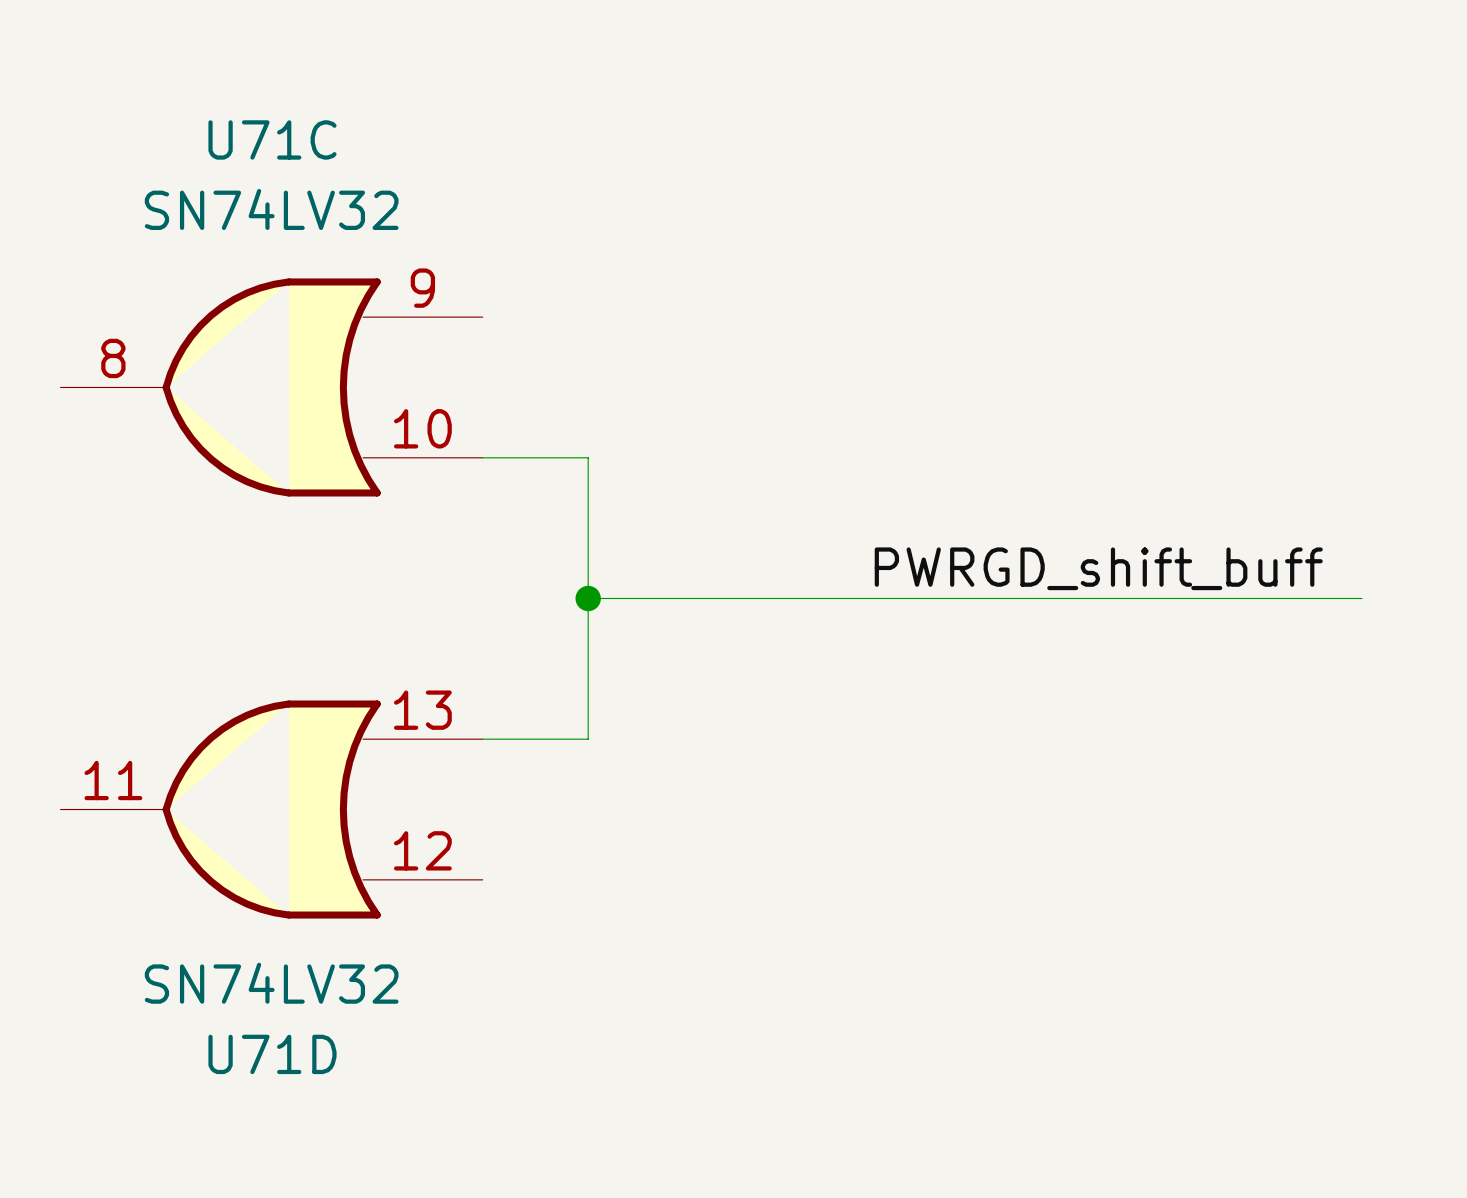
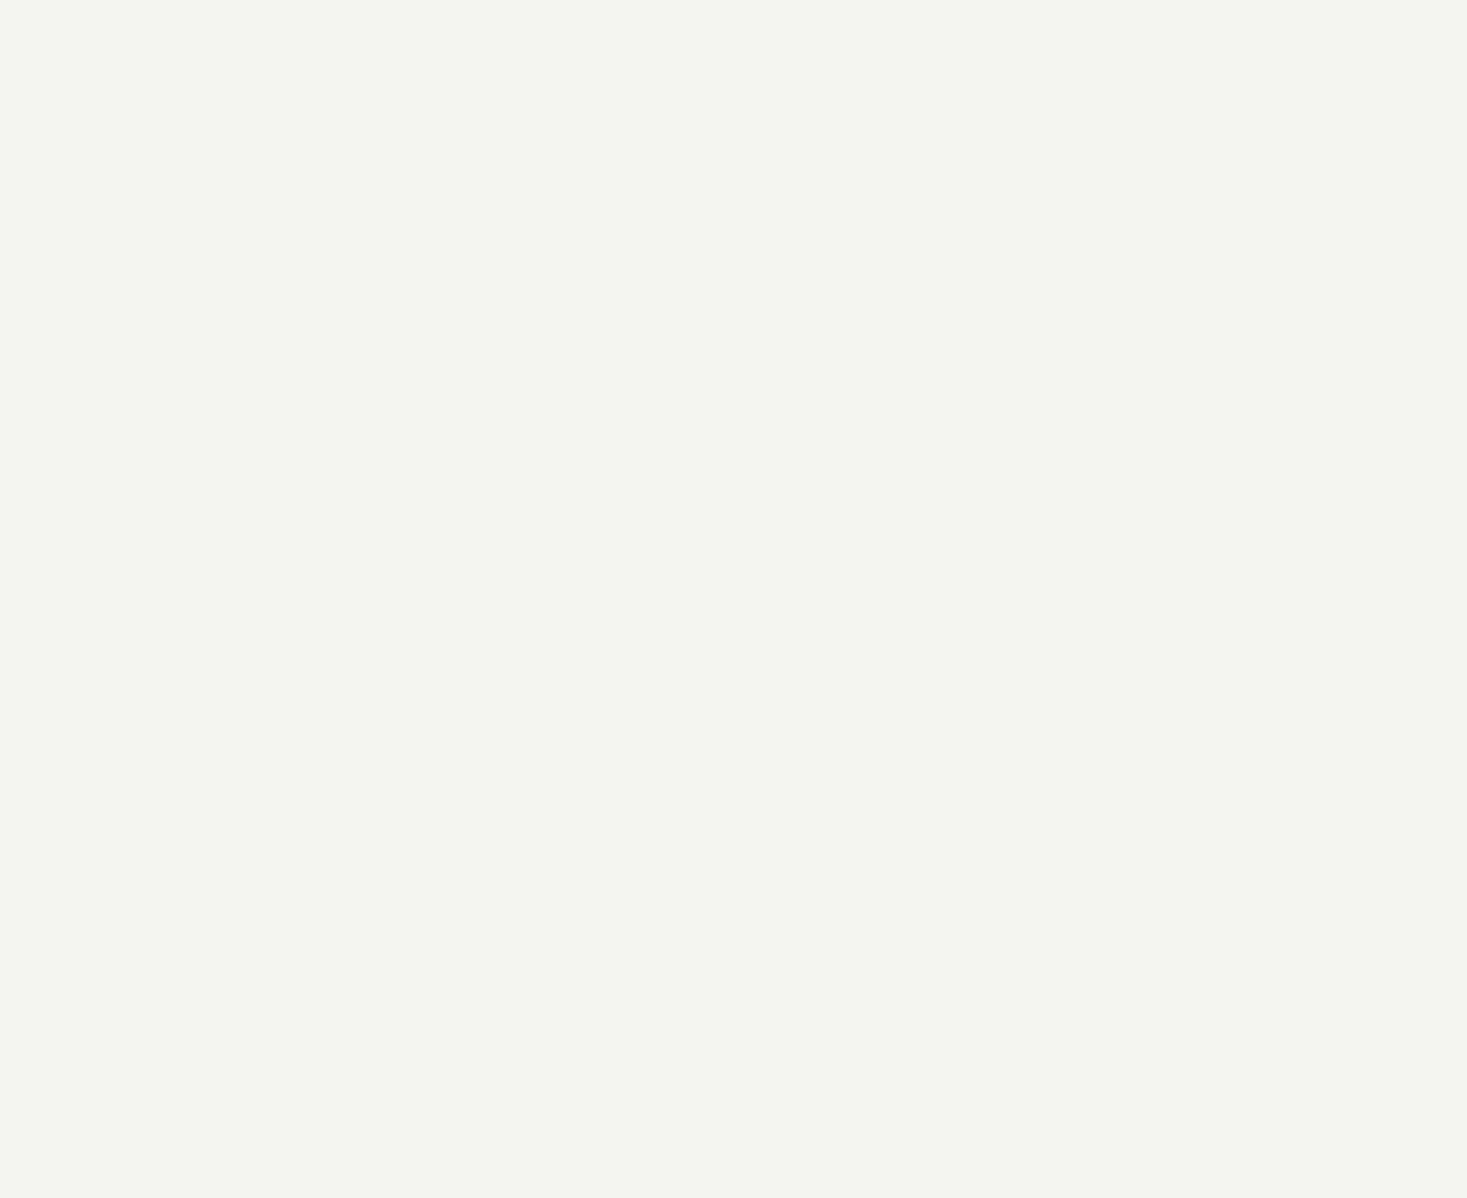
U71C: SN74LV32 (271, 387) -> none
wire: (482, 457) (588, 457) (588, 739) (482, 739) -> none
label: PWRGD_shift_buff (1098, 568) -> none
wire: (588, 598) (1361, 598) -> none
junction: (588, 598) -> none
U71D: SN74LV32 (271, 809) -> none

